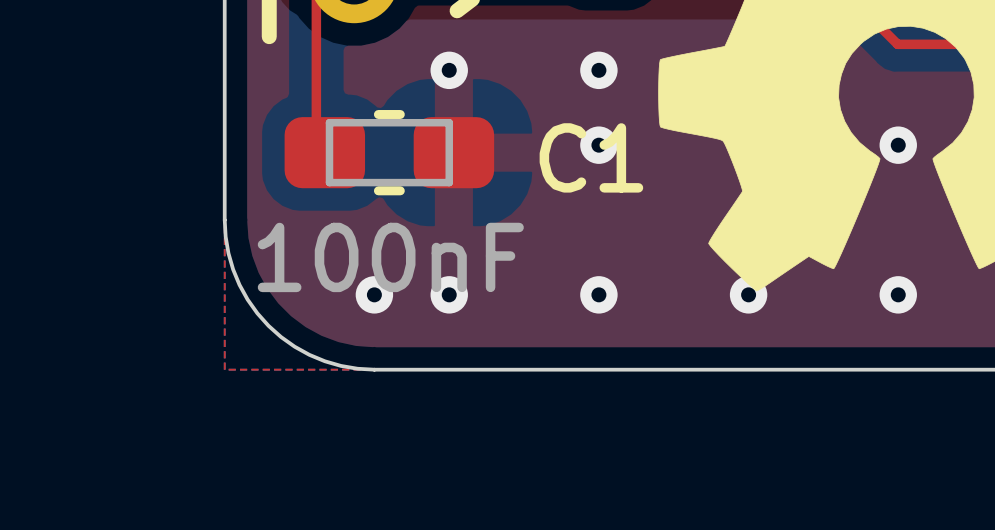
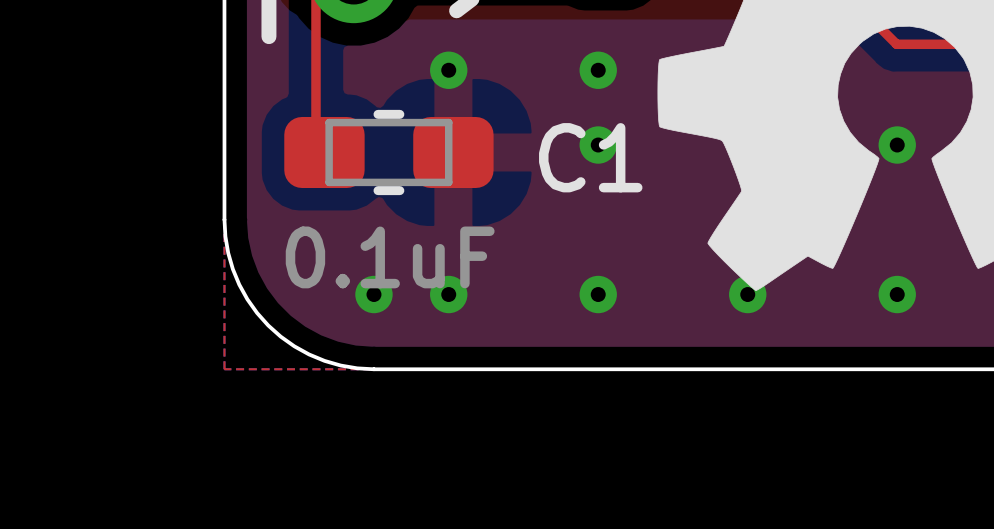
C1 value: 100nF (390, 257) -> 0.1uF (390, 257)

